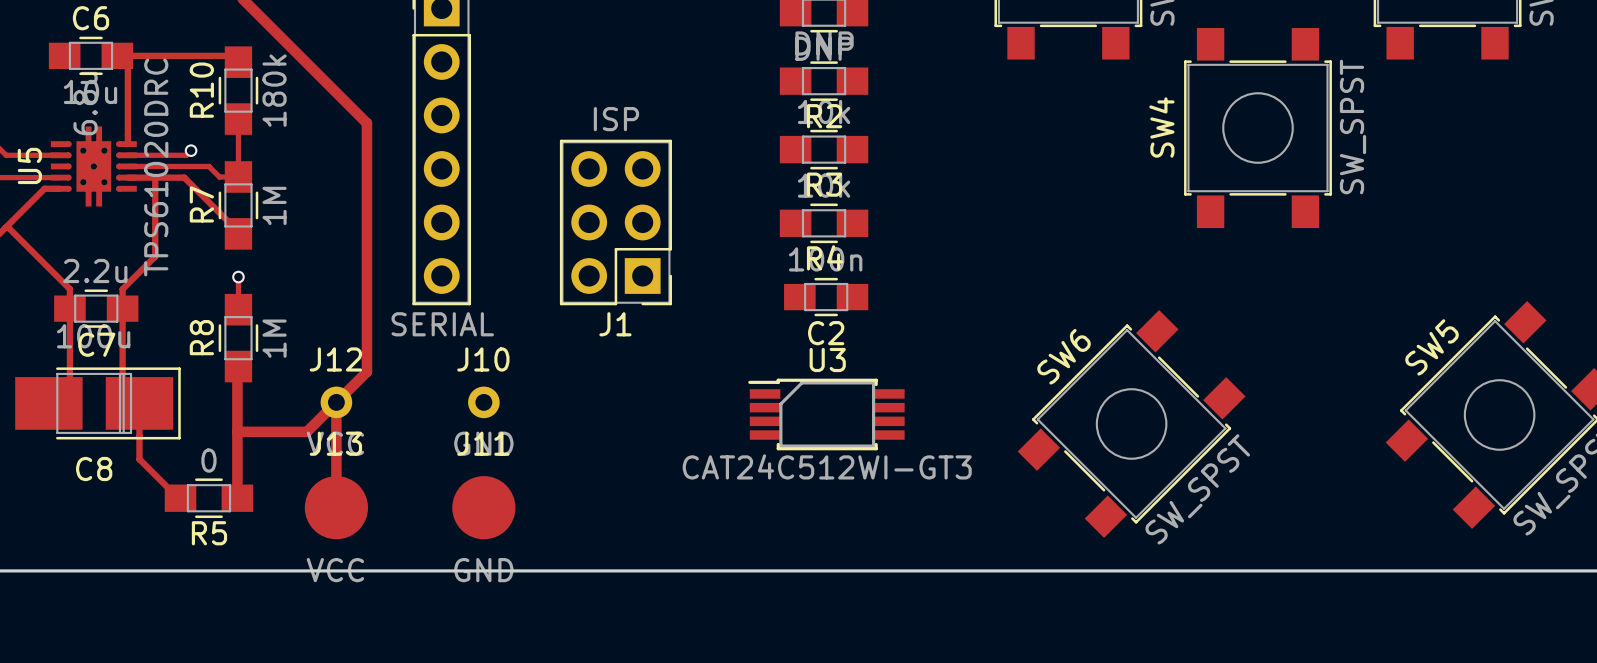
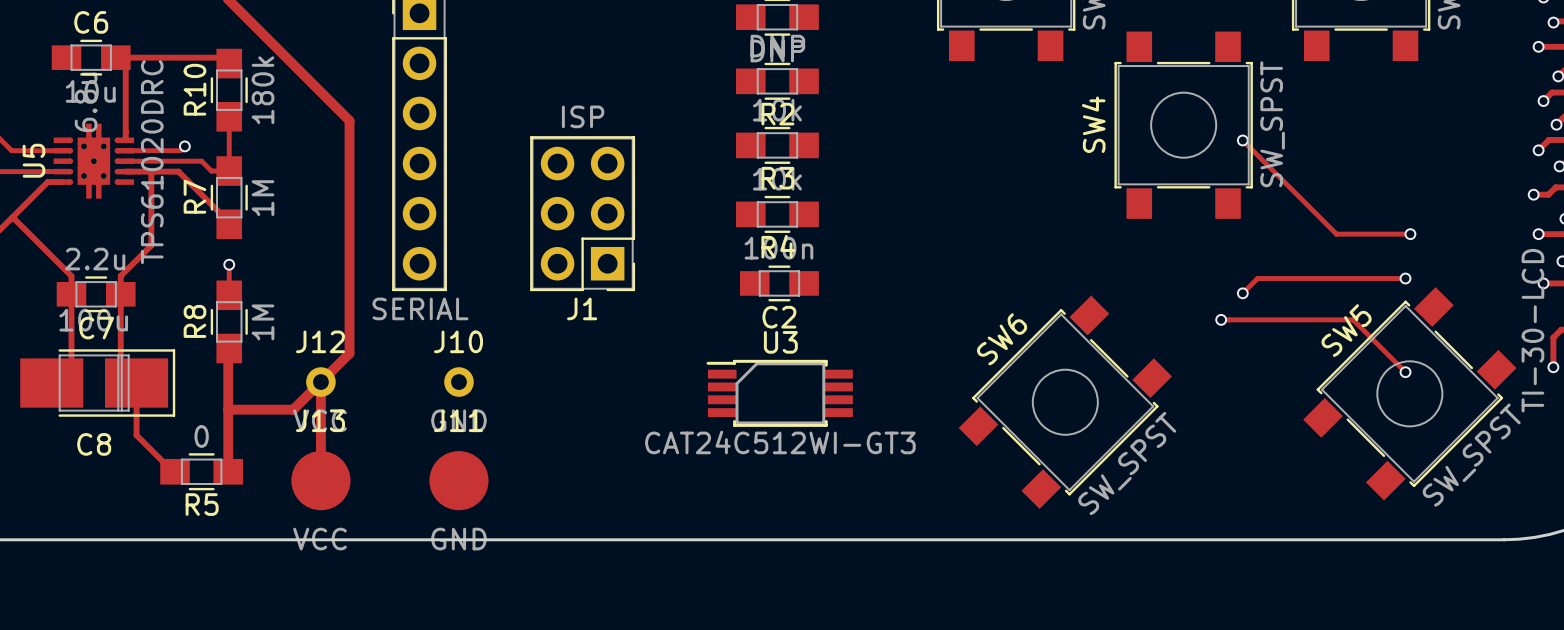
track: none -> (1242, 140) (1336, 234) (1410, 234)
via: none -> (1242, 140)
via: none -> (1410, 234)
track: none -> (1405, 278) (1257, 278) (1242, 293)
via: none -> (1405, 278)
via: none -> (1242, 293)
track: none -> (1221, 319) (1353, 319) (1405, 372)
via: none -> (1221, 319)
via: none -> (1405, 372)

